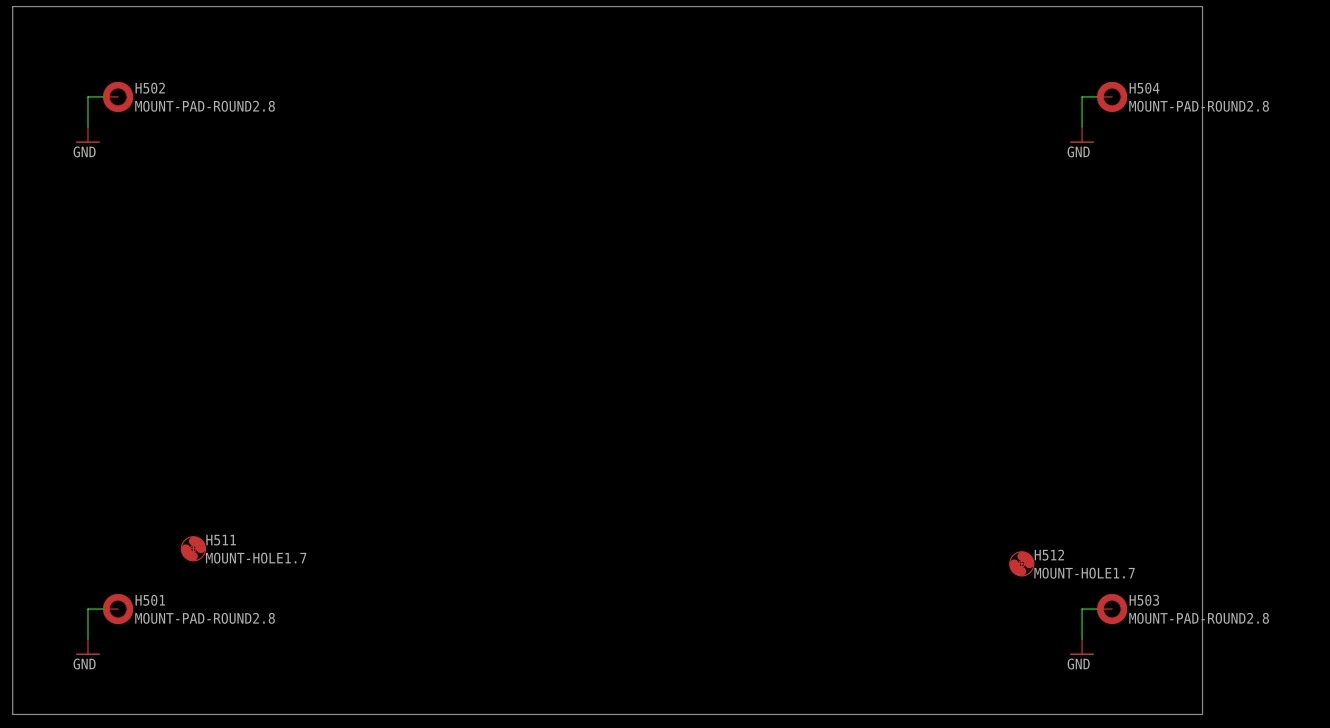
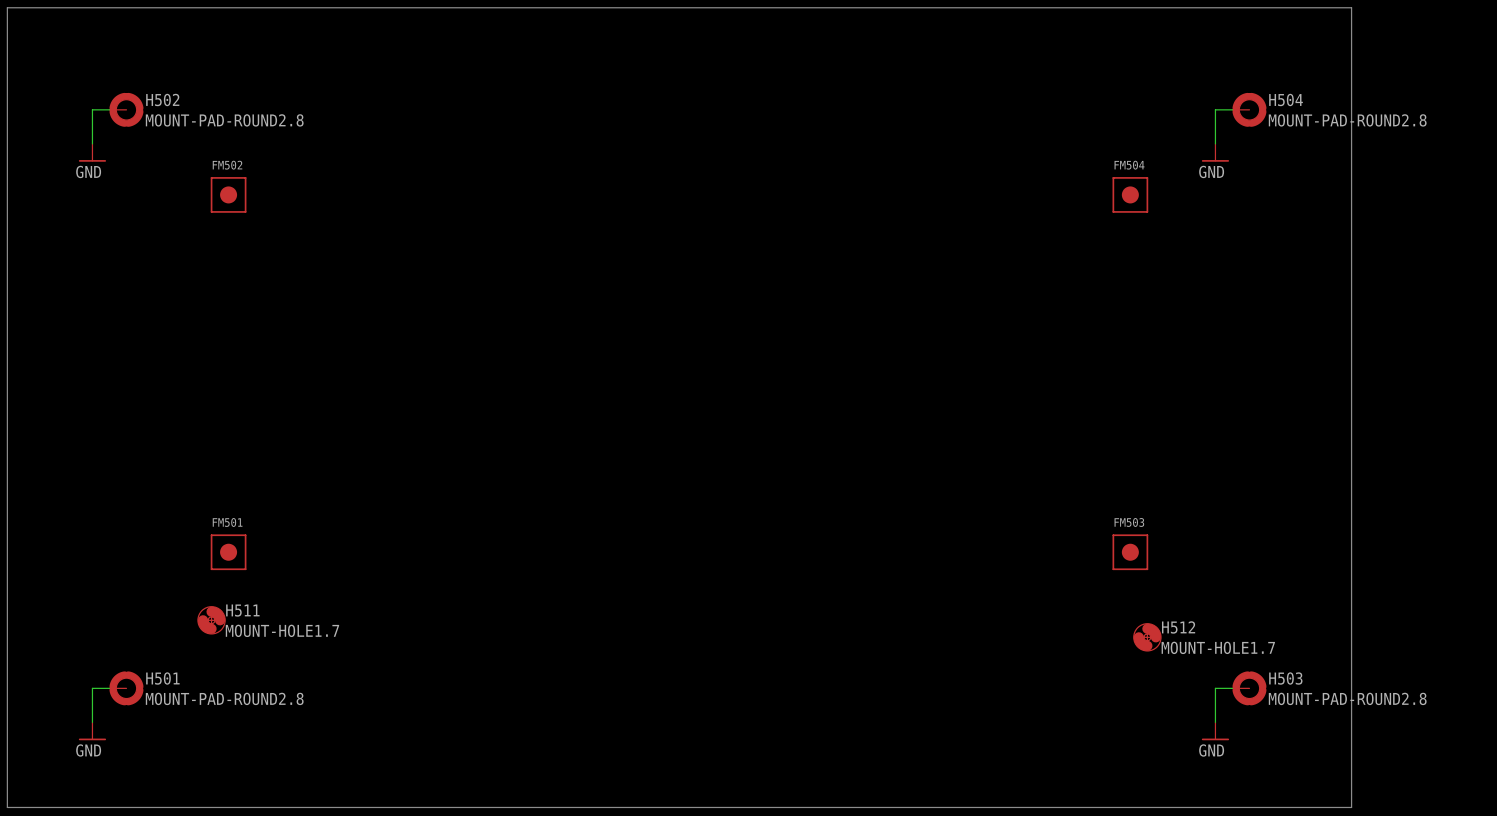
FM502: none -> (228, 194)
FM504: none -> (1130, 194)
FM501: none -> (228, 552)
FM503: none -> (1130, 552)

